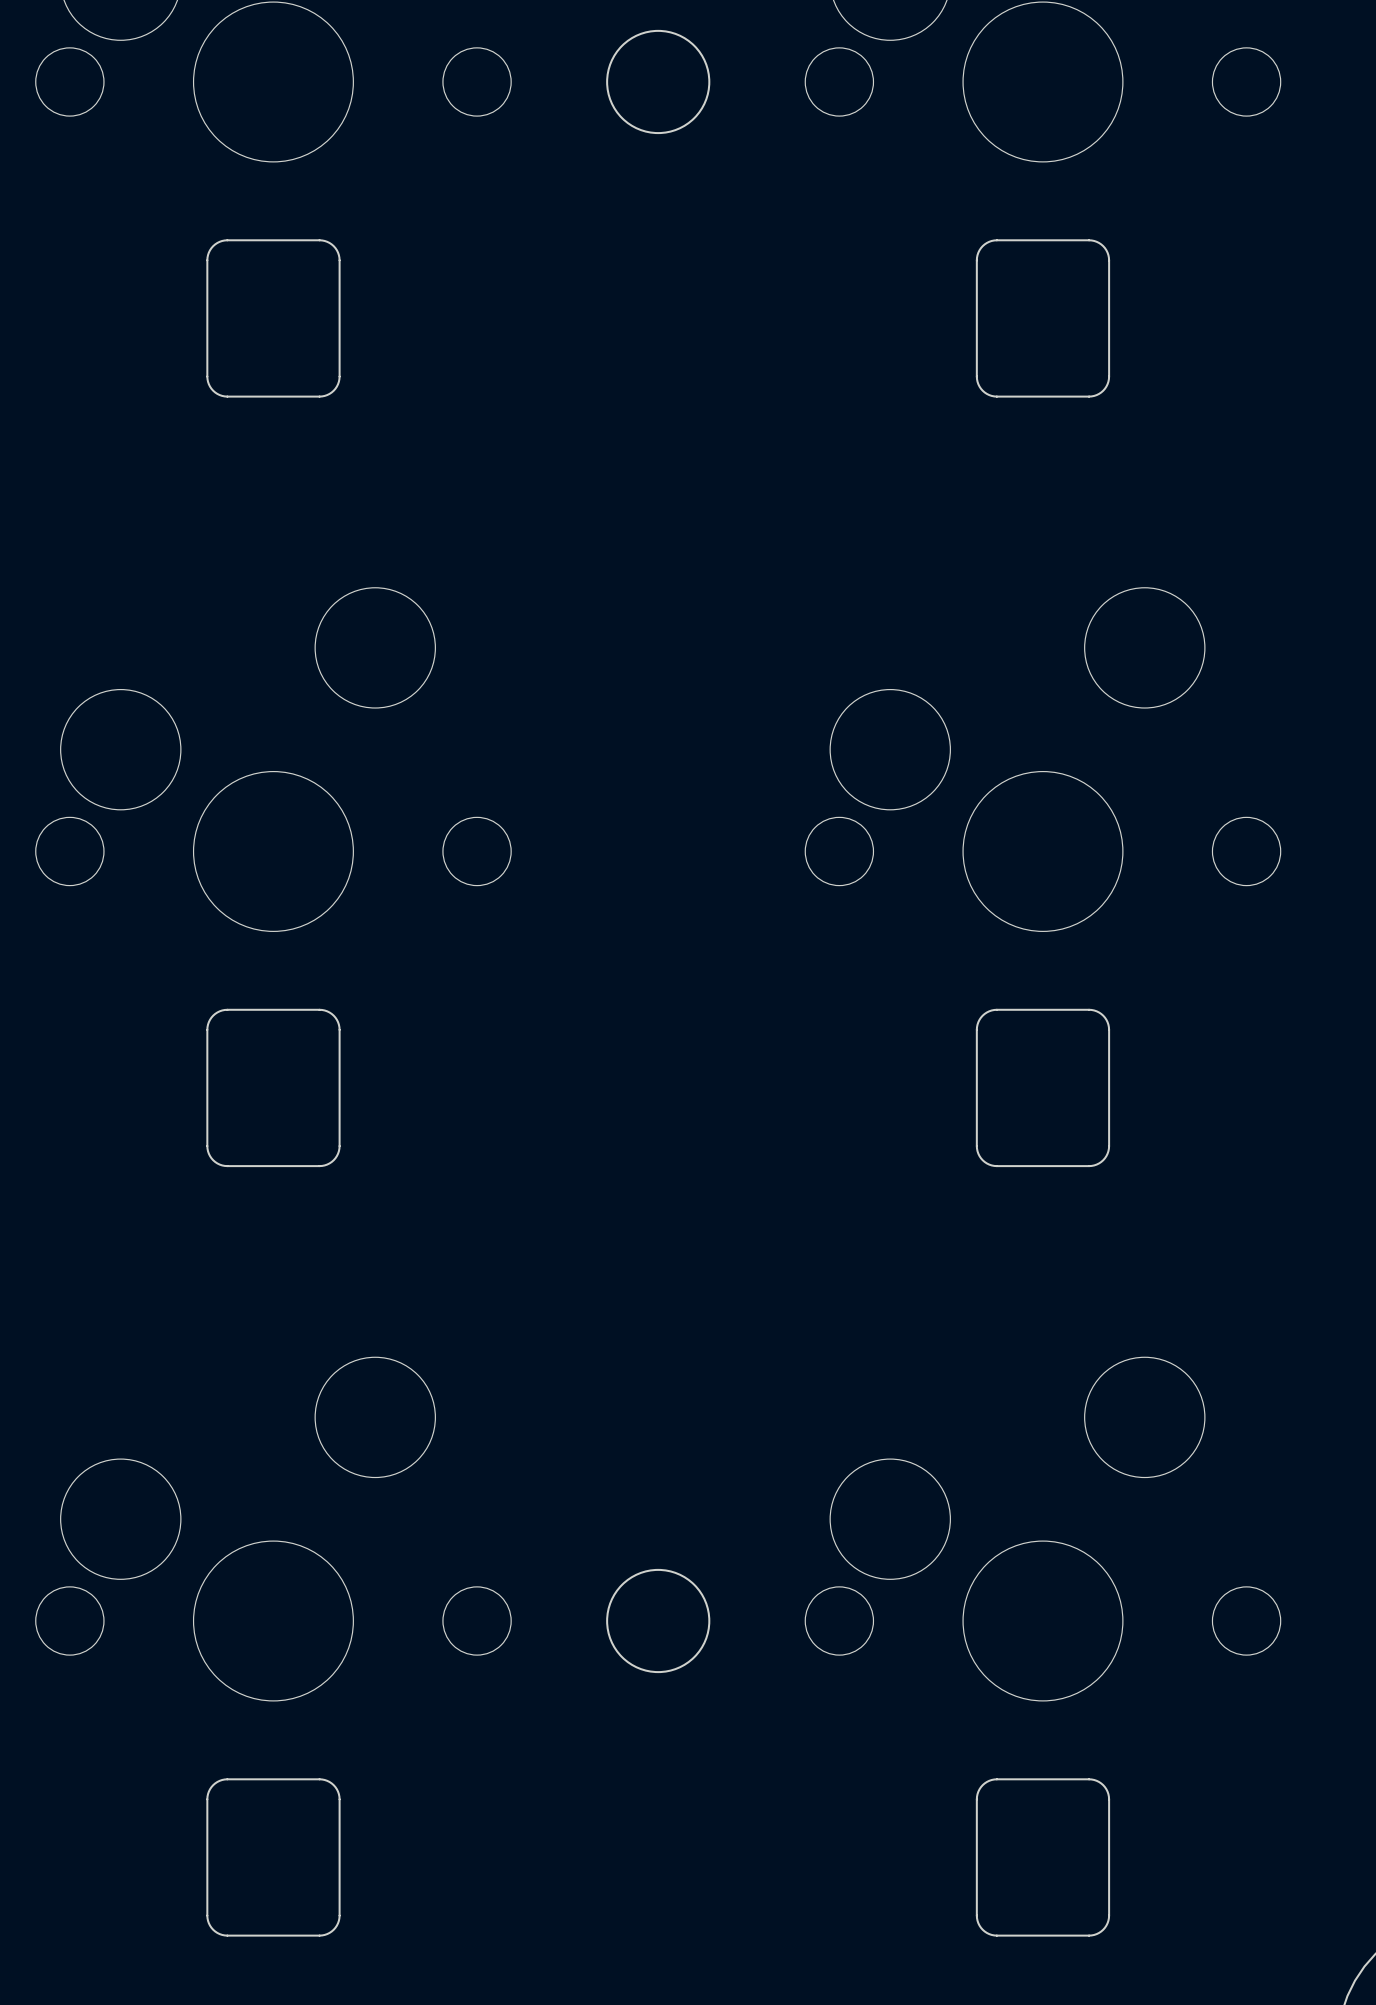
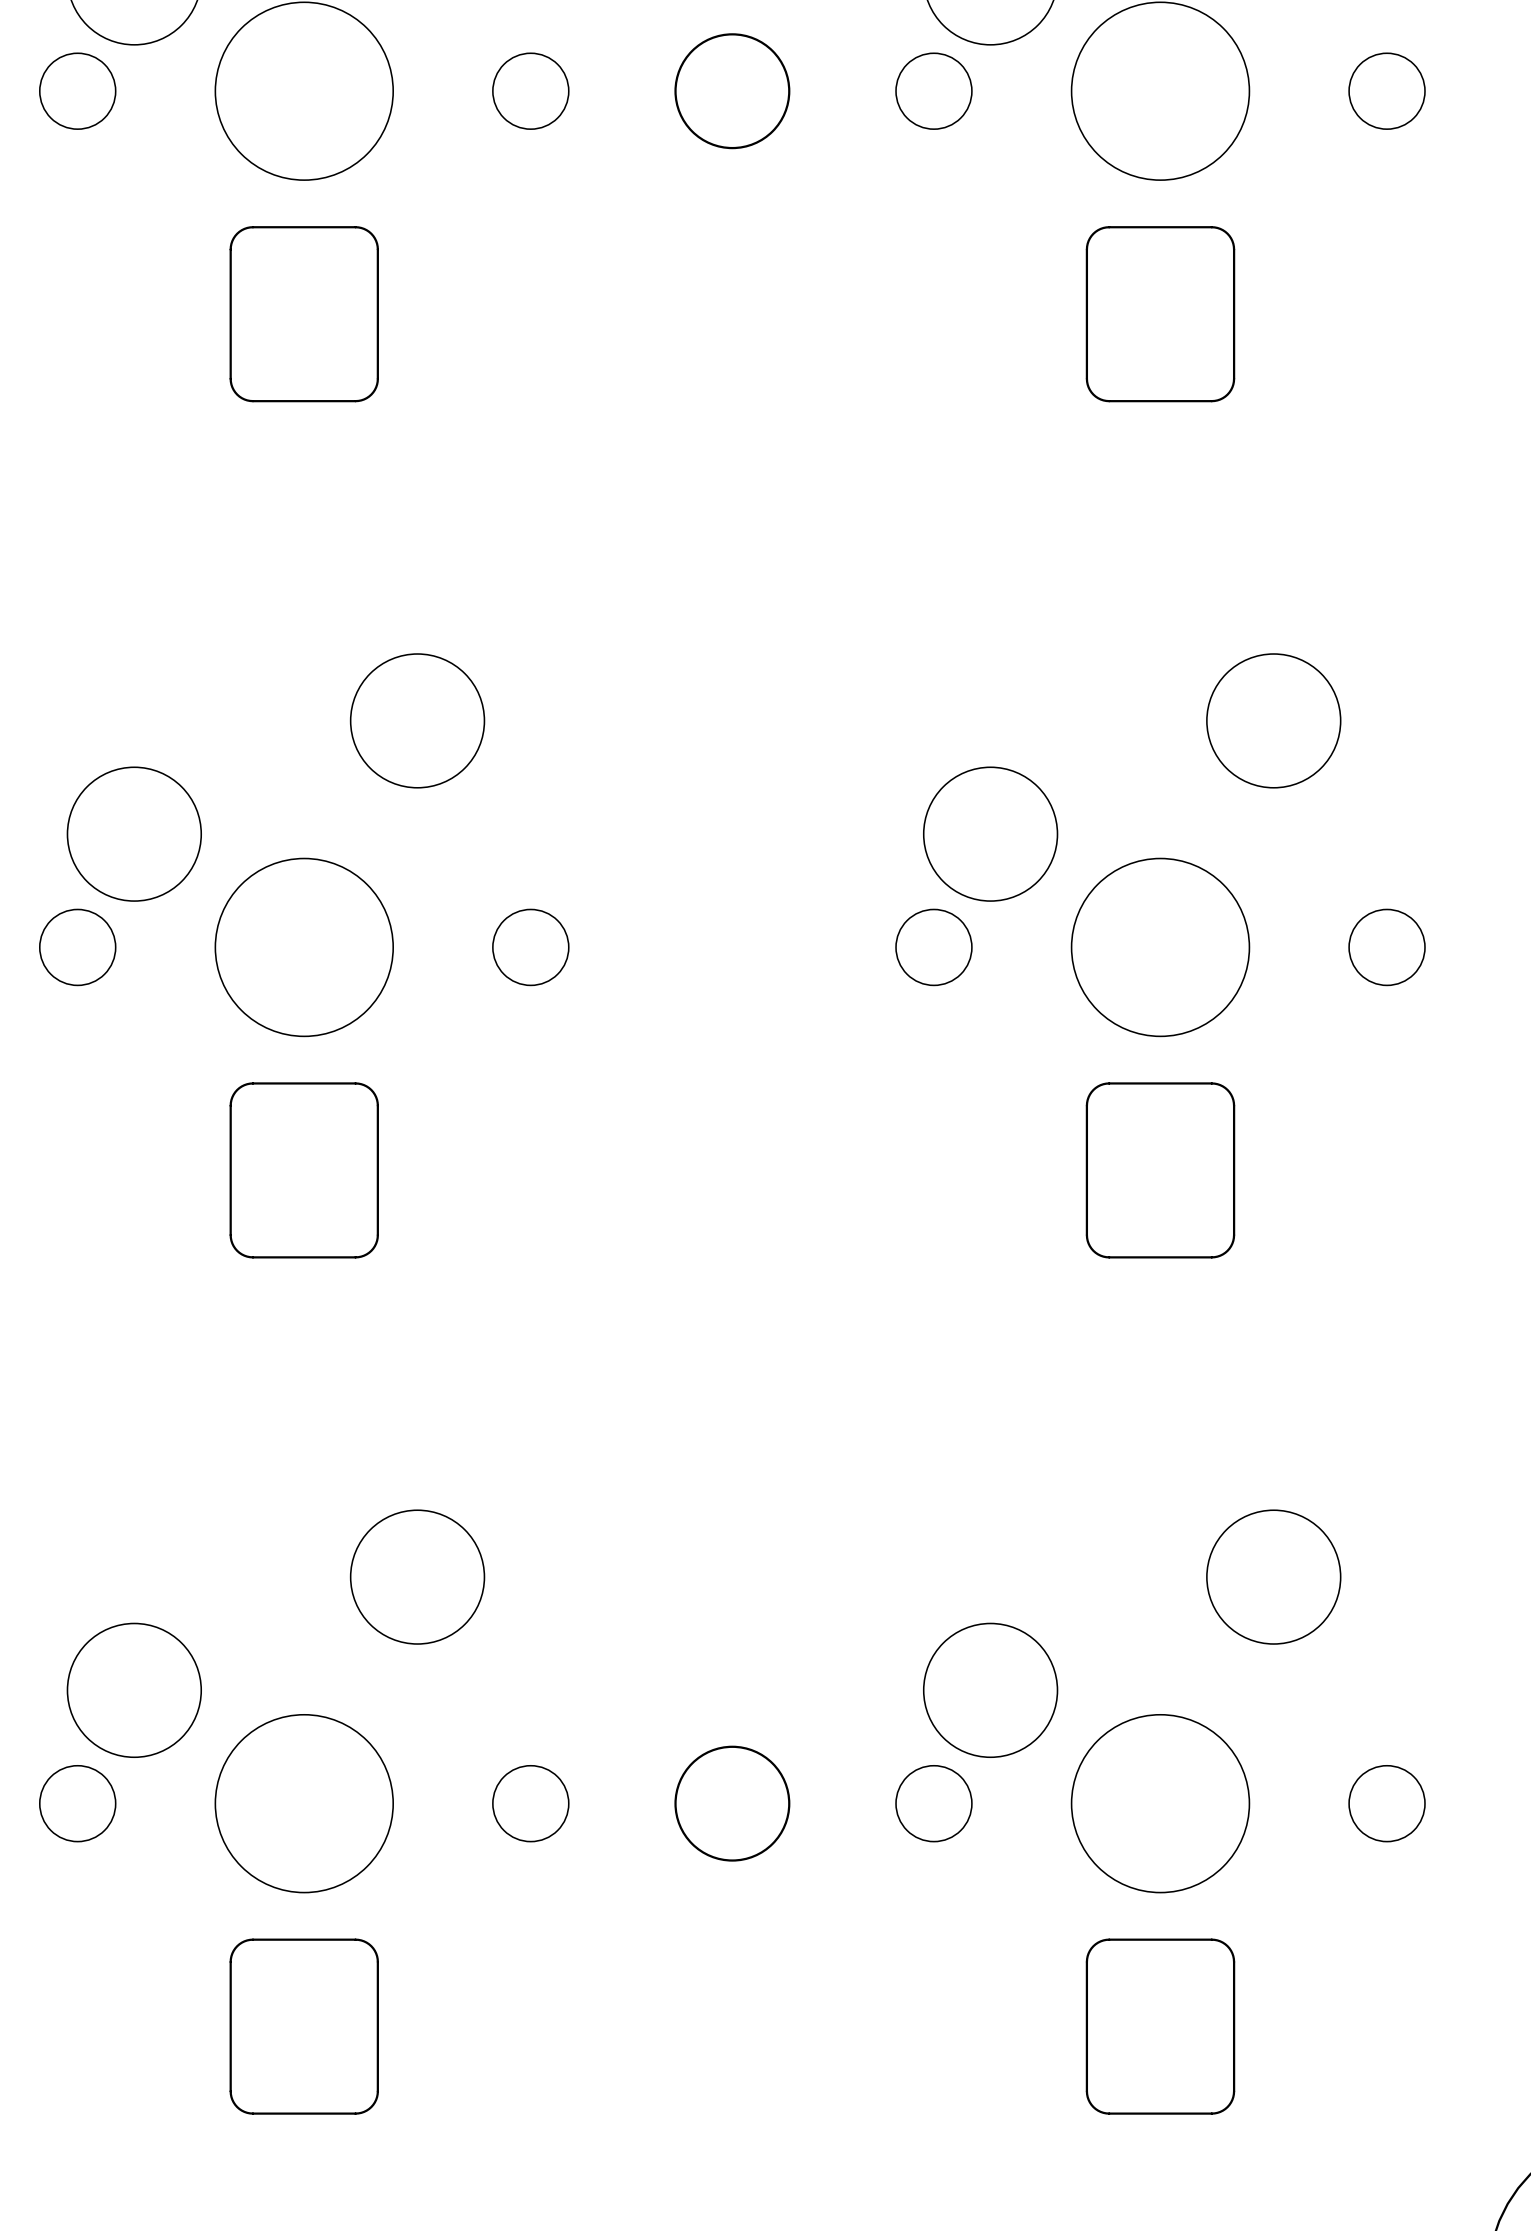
part position: (273, 318) -> (304, 314)
part position: (1042, 318) -> (1160, 314)
part position: (273, 1087) -> (304, 1170)
part position: (1042, 1087) -> (1160, 1170)
part position: (273, 1857) -> (304, 2026)
part position: (1042, 1857) -> (1160, 2026)

